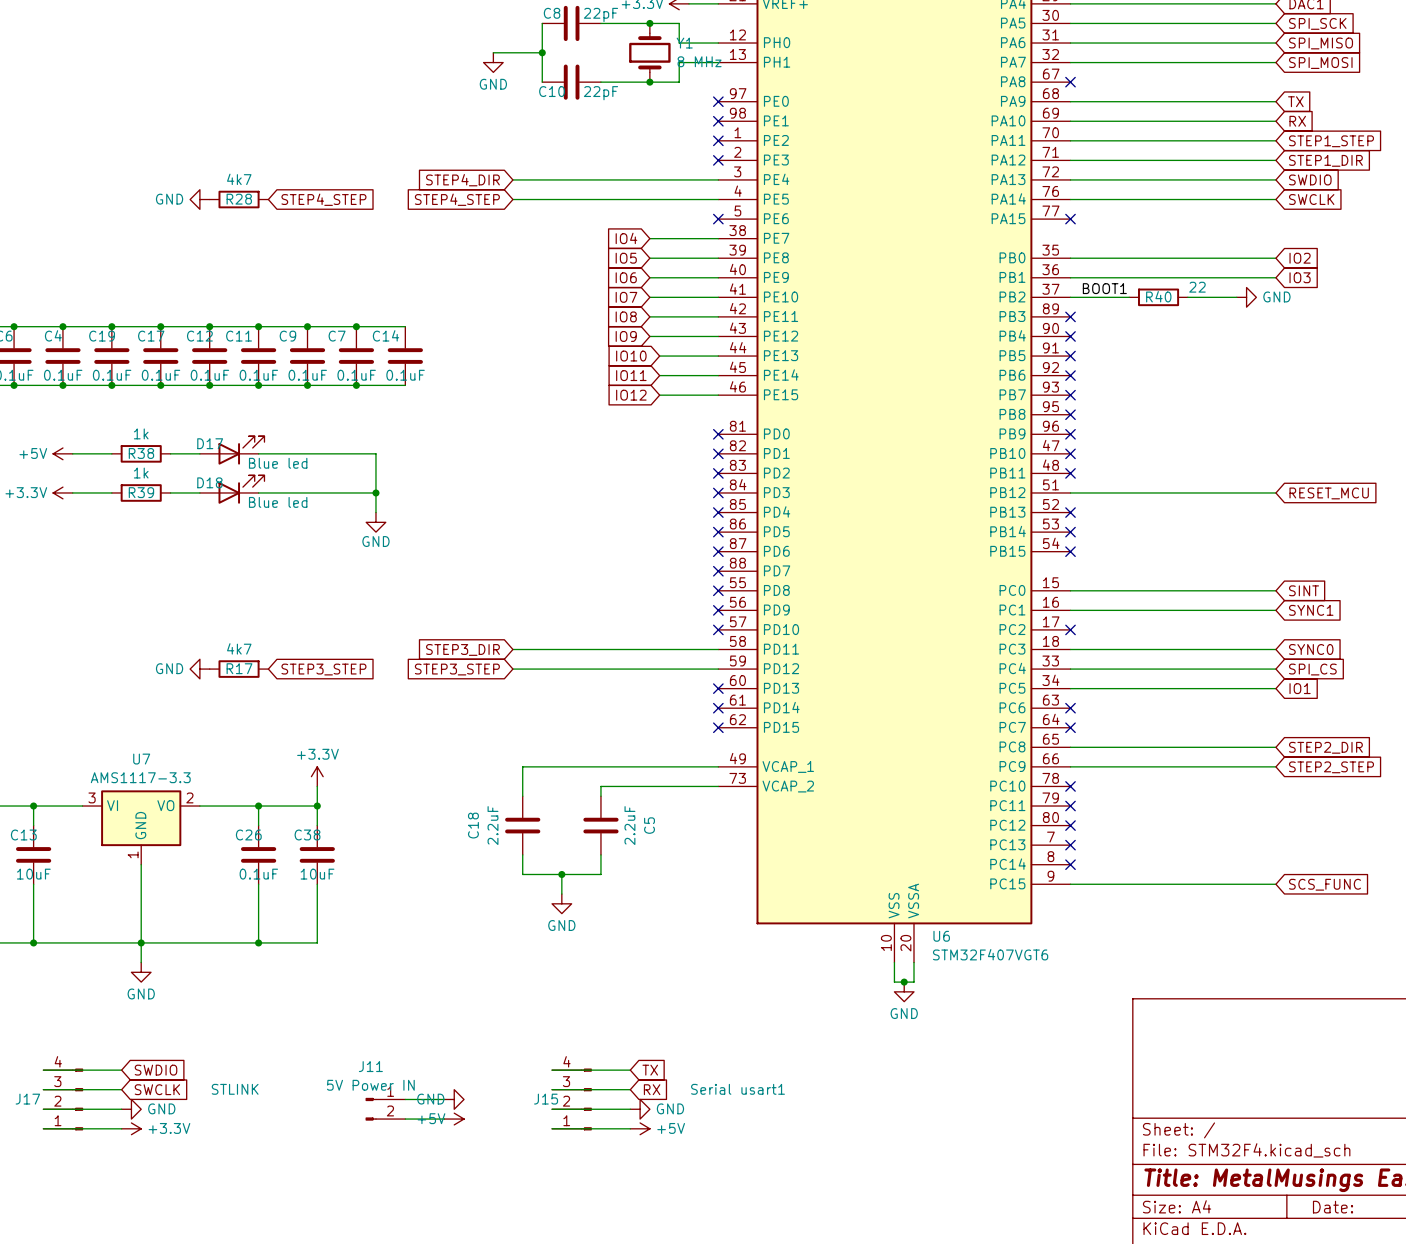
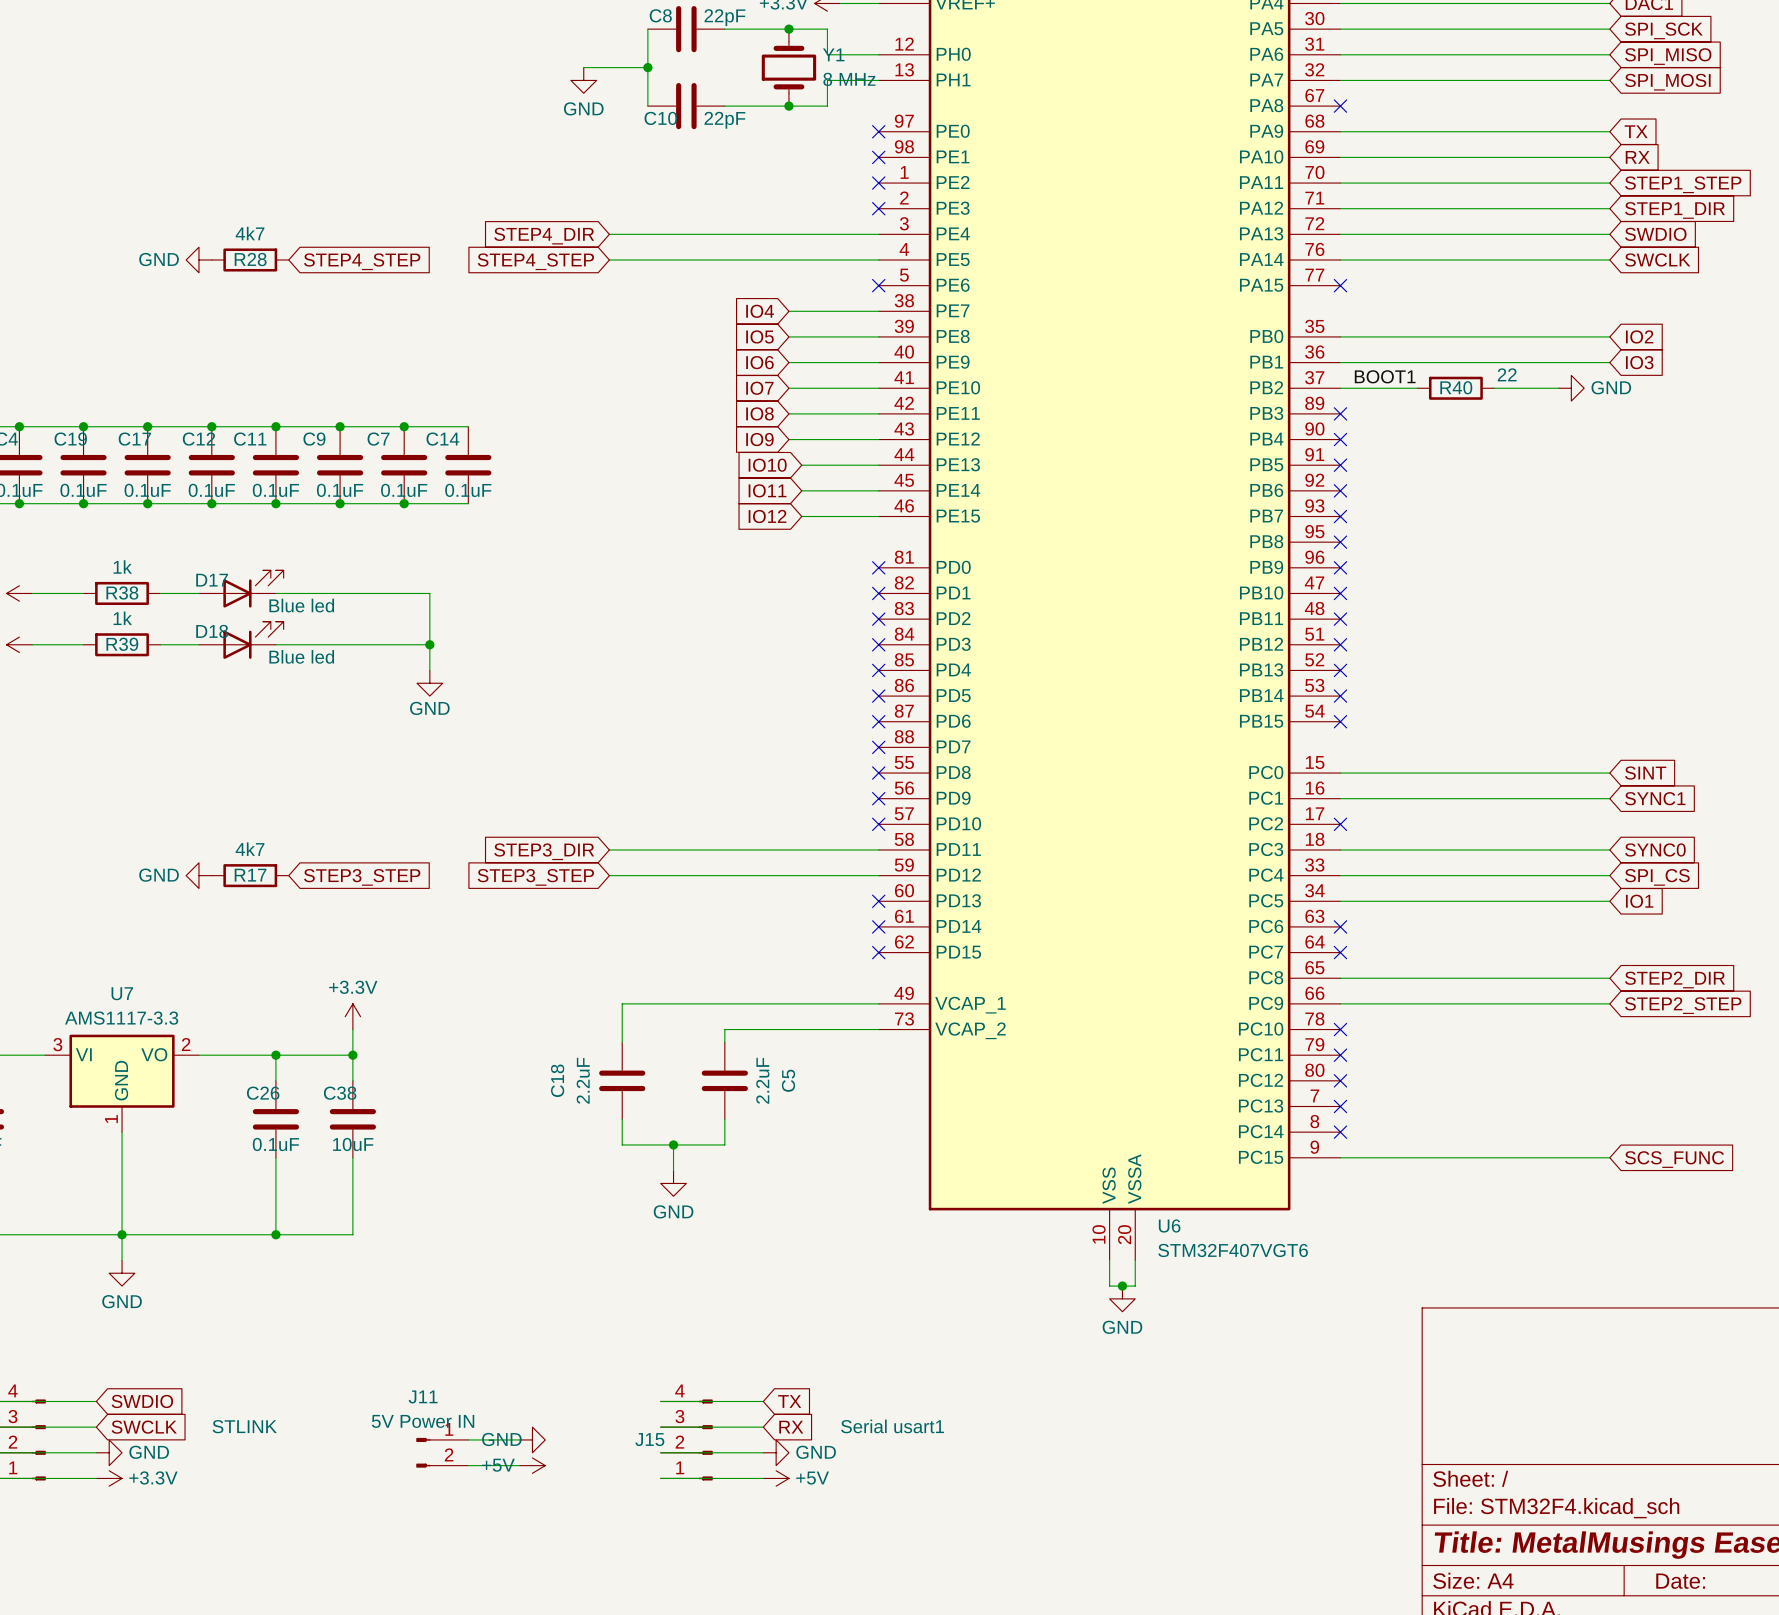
wire: (1070, 492) (1275, 492) -> none
no-connect mark: none -> (1340, 644)
global label: RESET_MCU (1329, 493) -> none

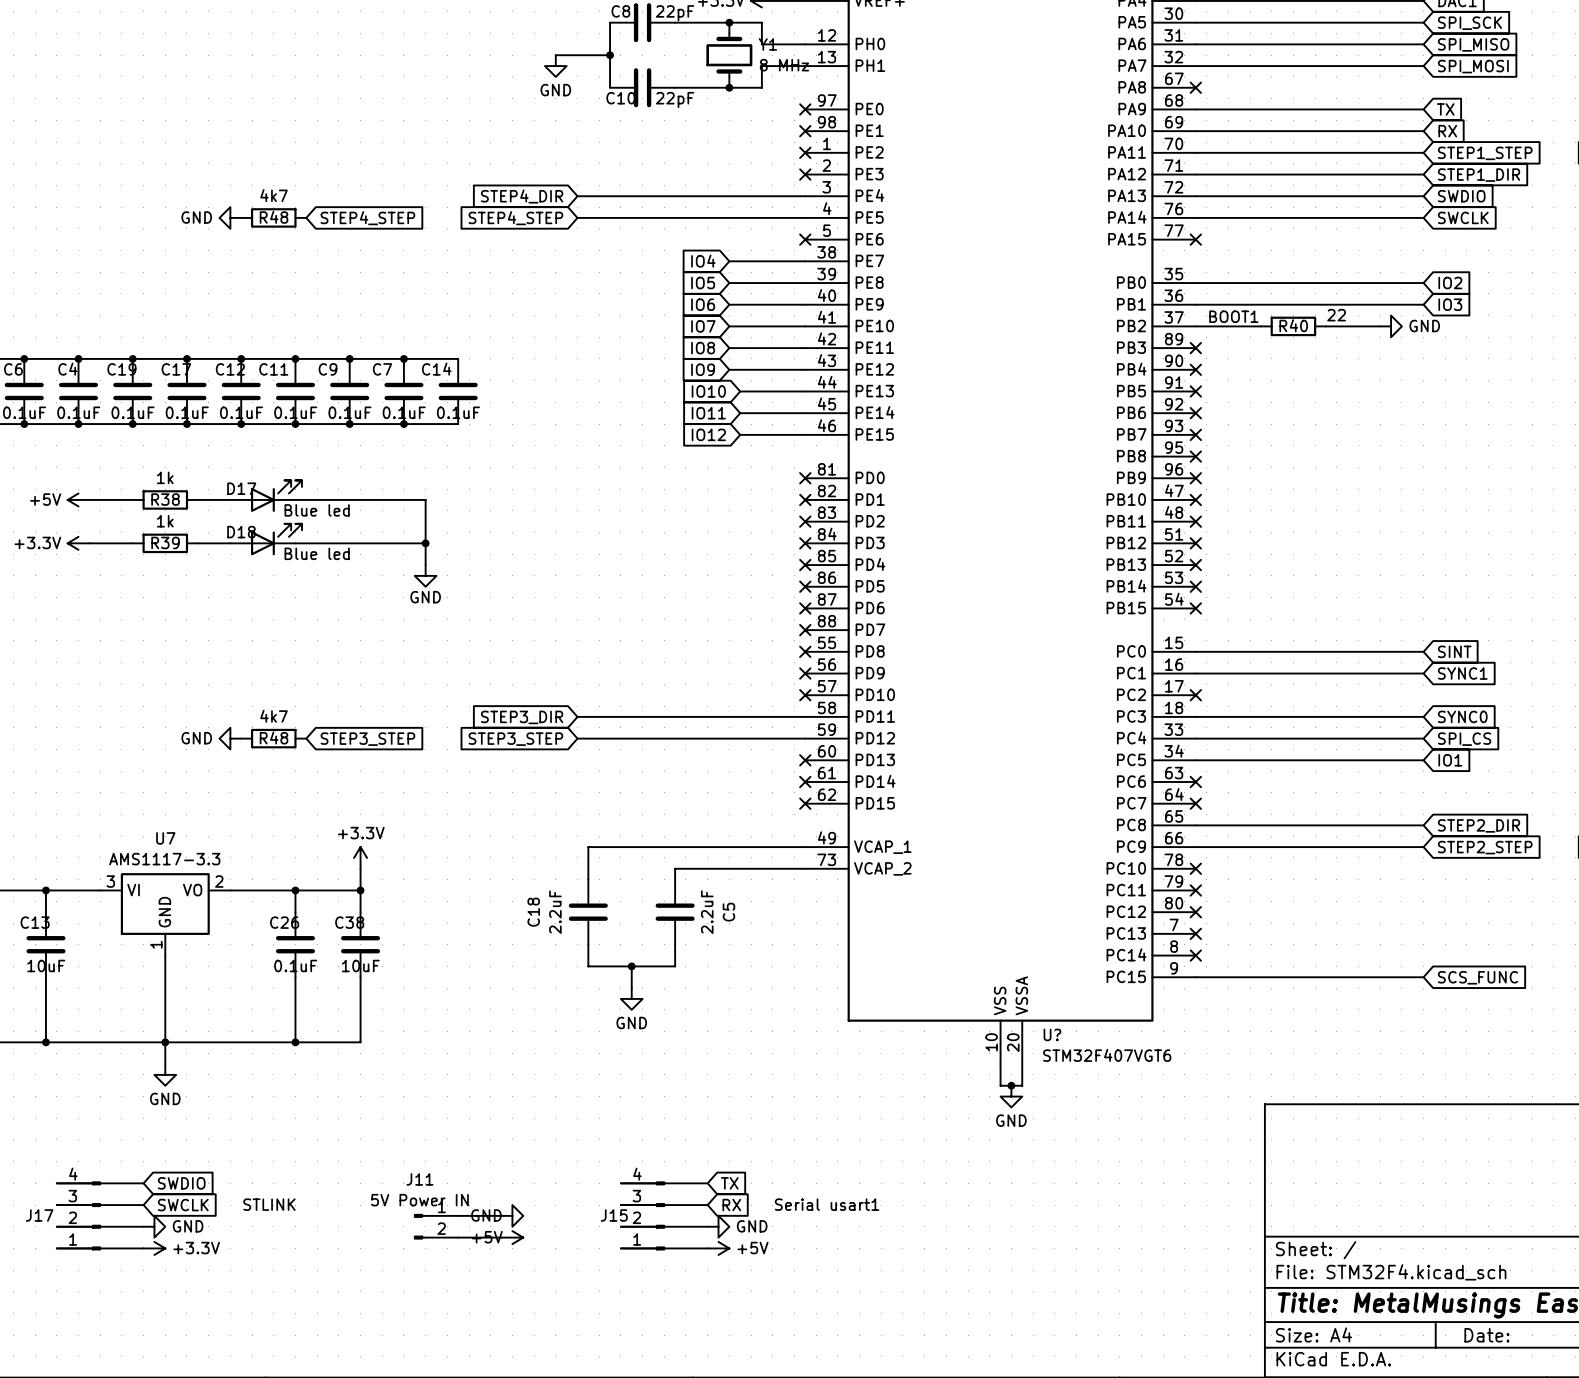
R28 name: R28 (250, 259) -> R48 (274, 217)
R17 name: R17 (250, 875) -> R48 (274, 737)
U6 name: U6 (1169, 1225) -> U? (1052, 1034)

